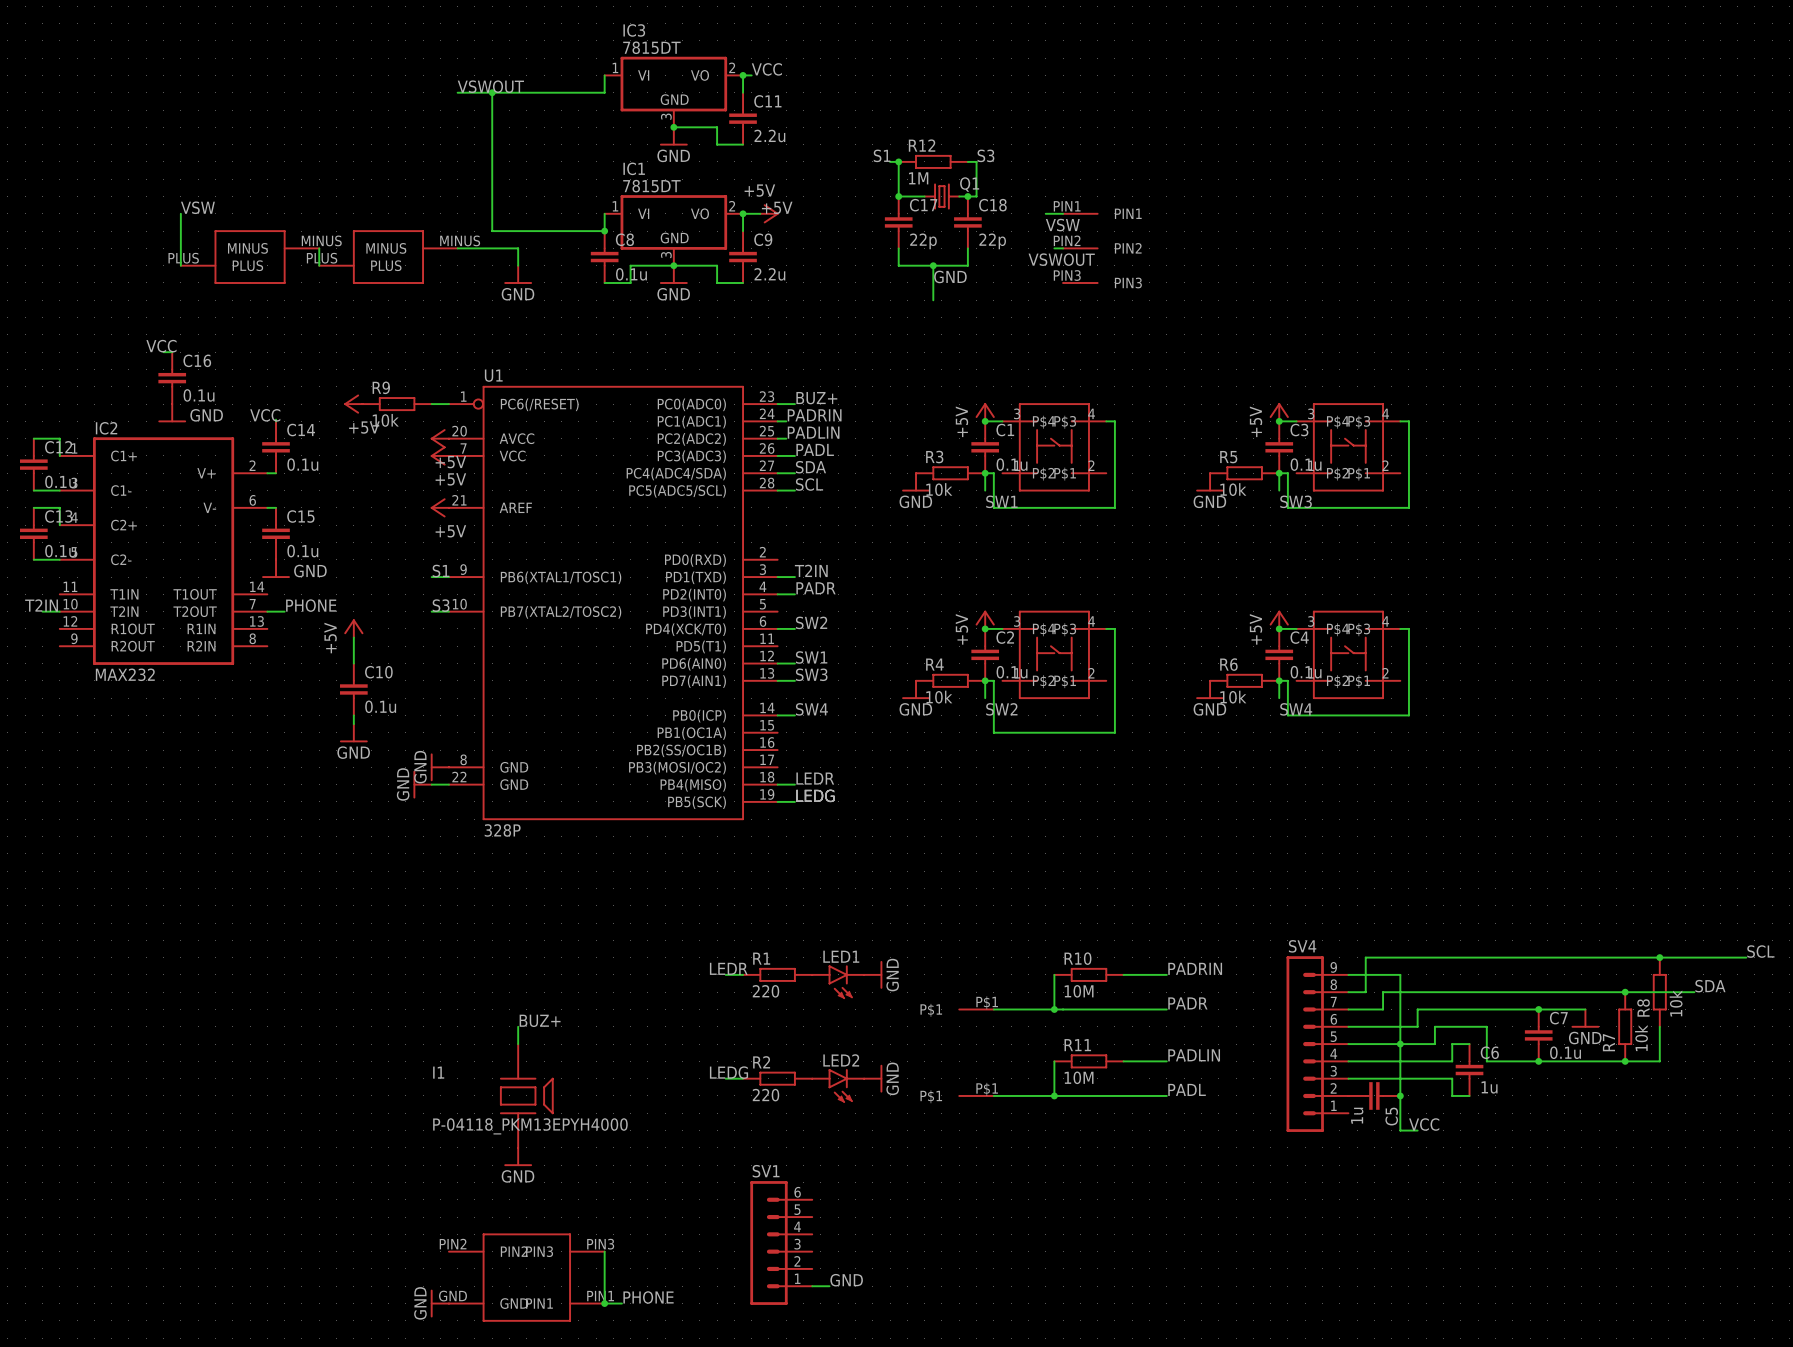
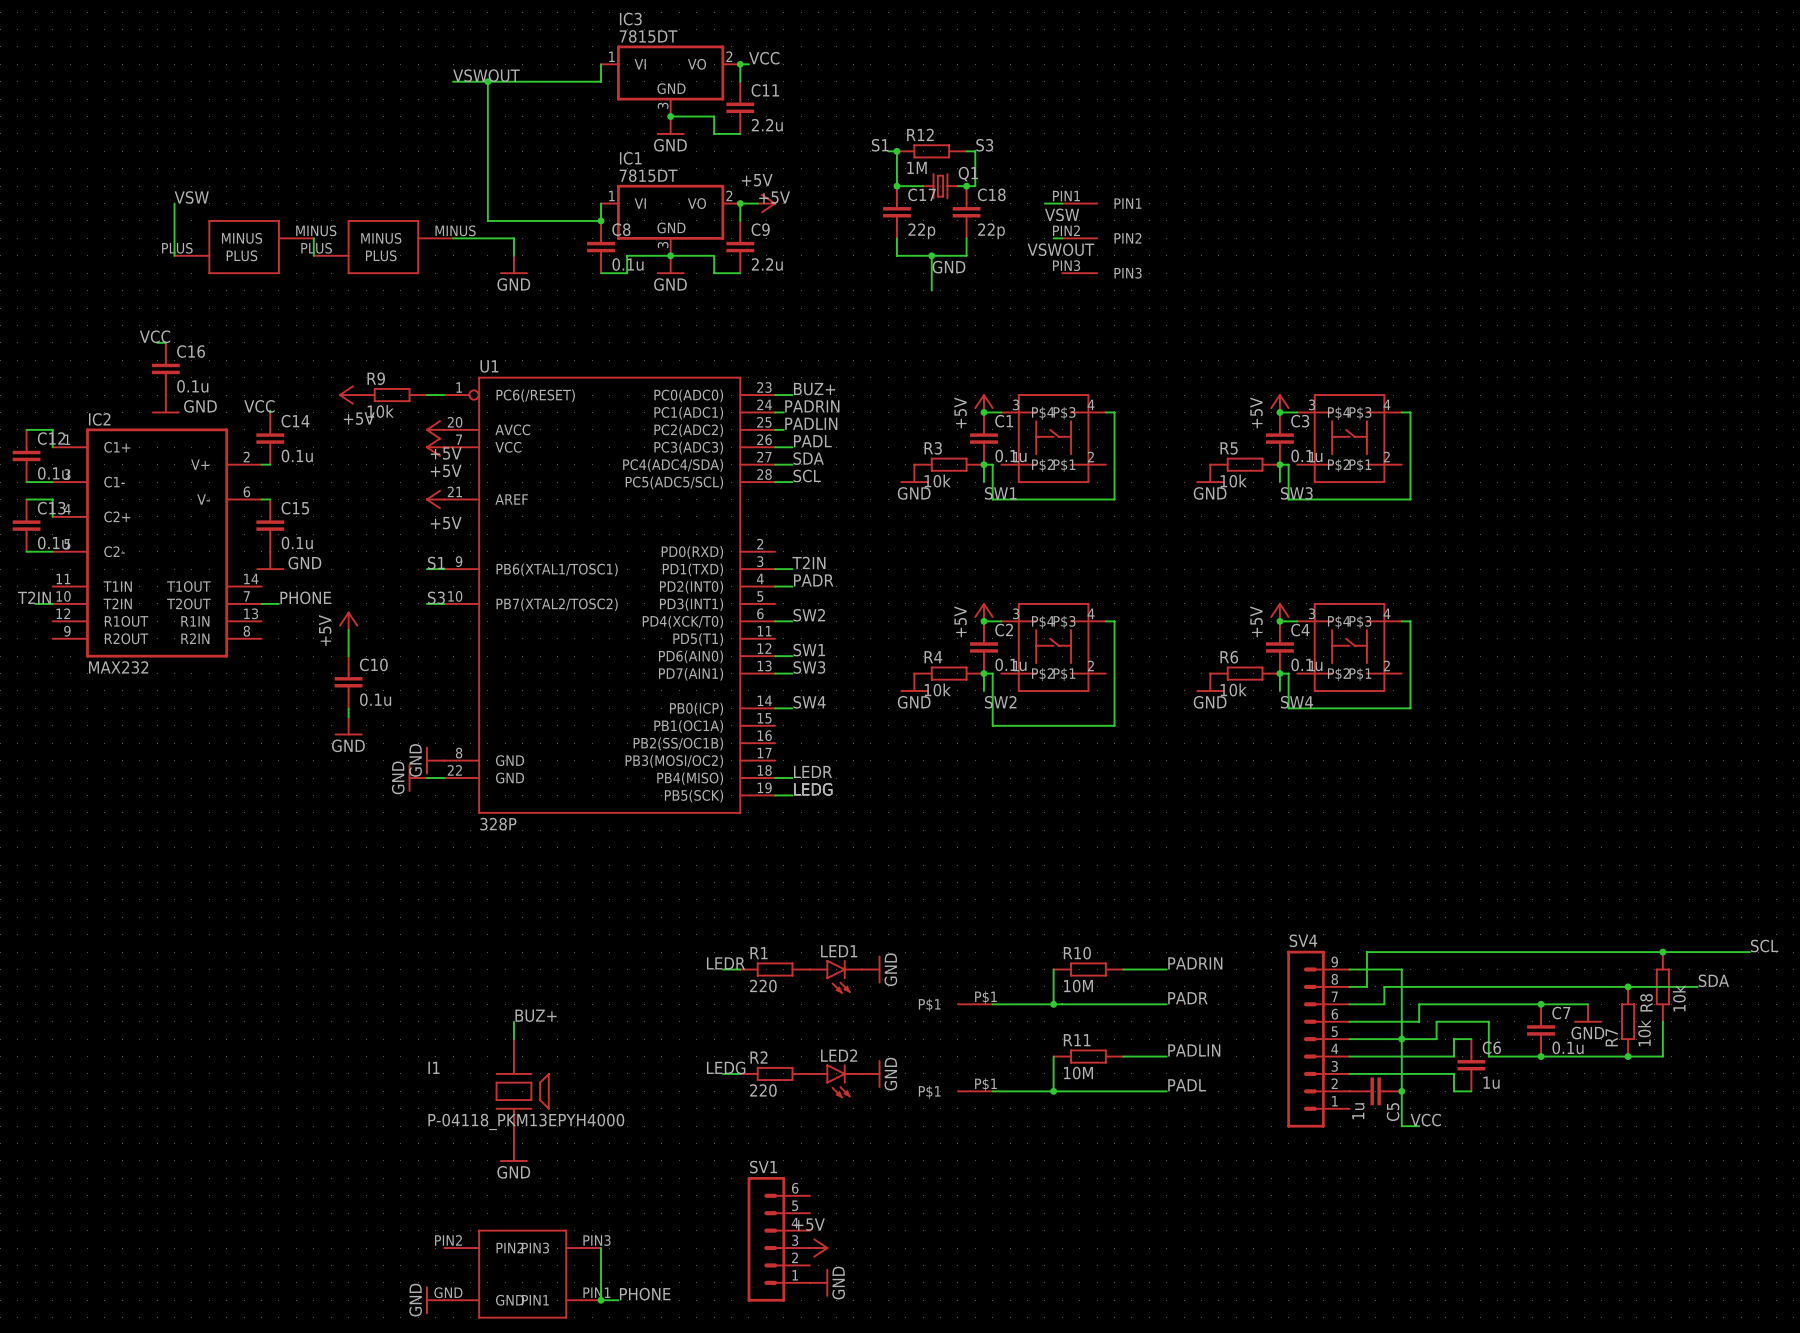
power symbol: none -> +5V (819, 1248)
label: GND (846, 1280) -> none
power symbol: none -> GND (819, 1282)

